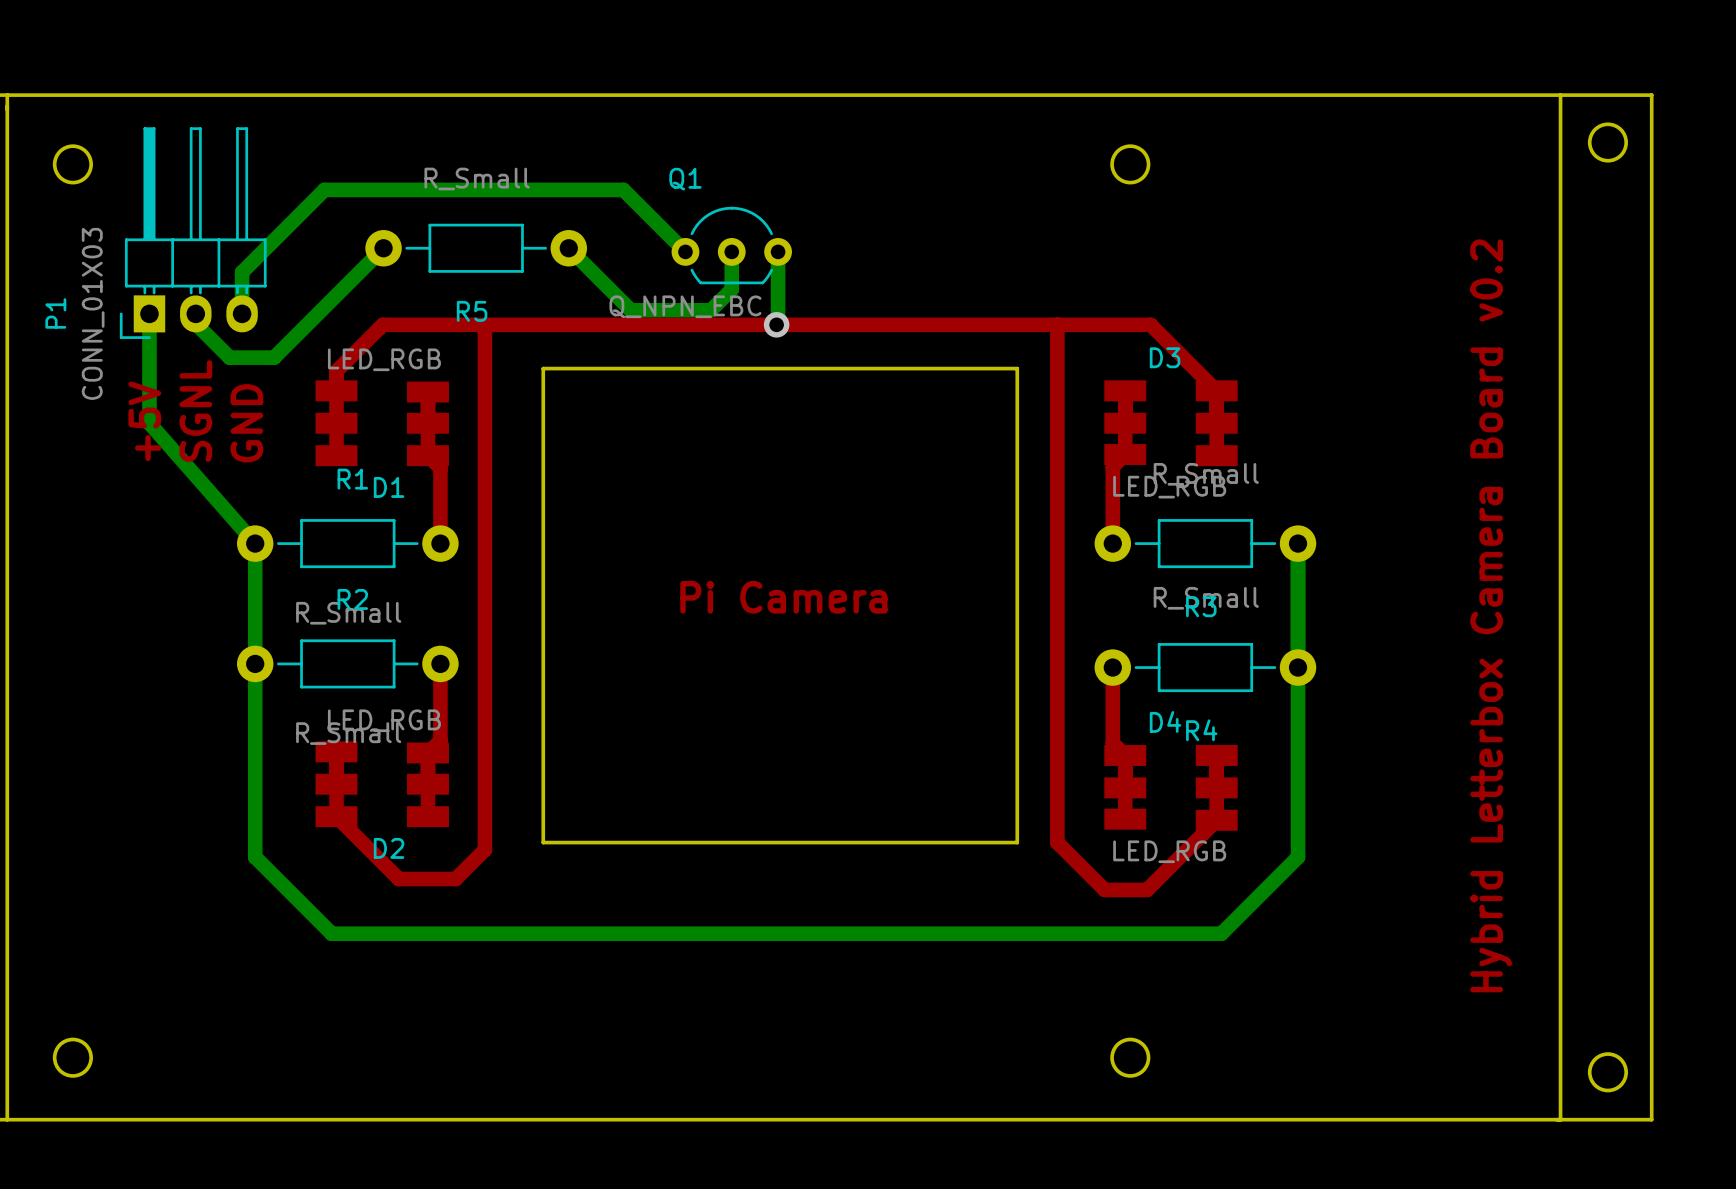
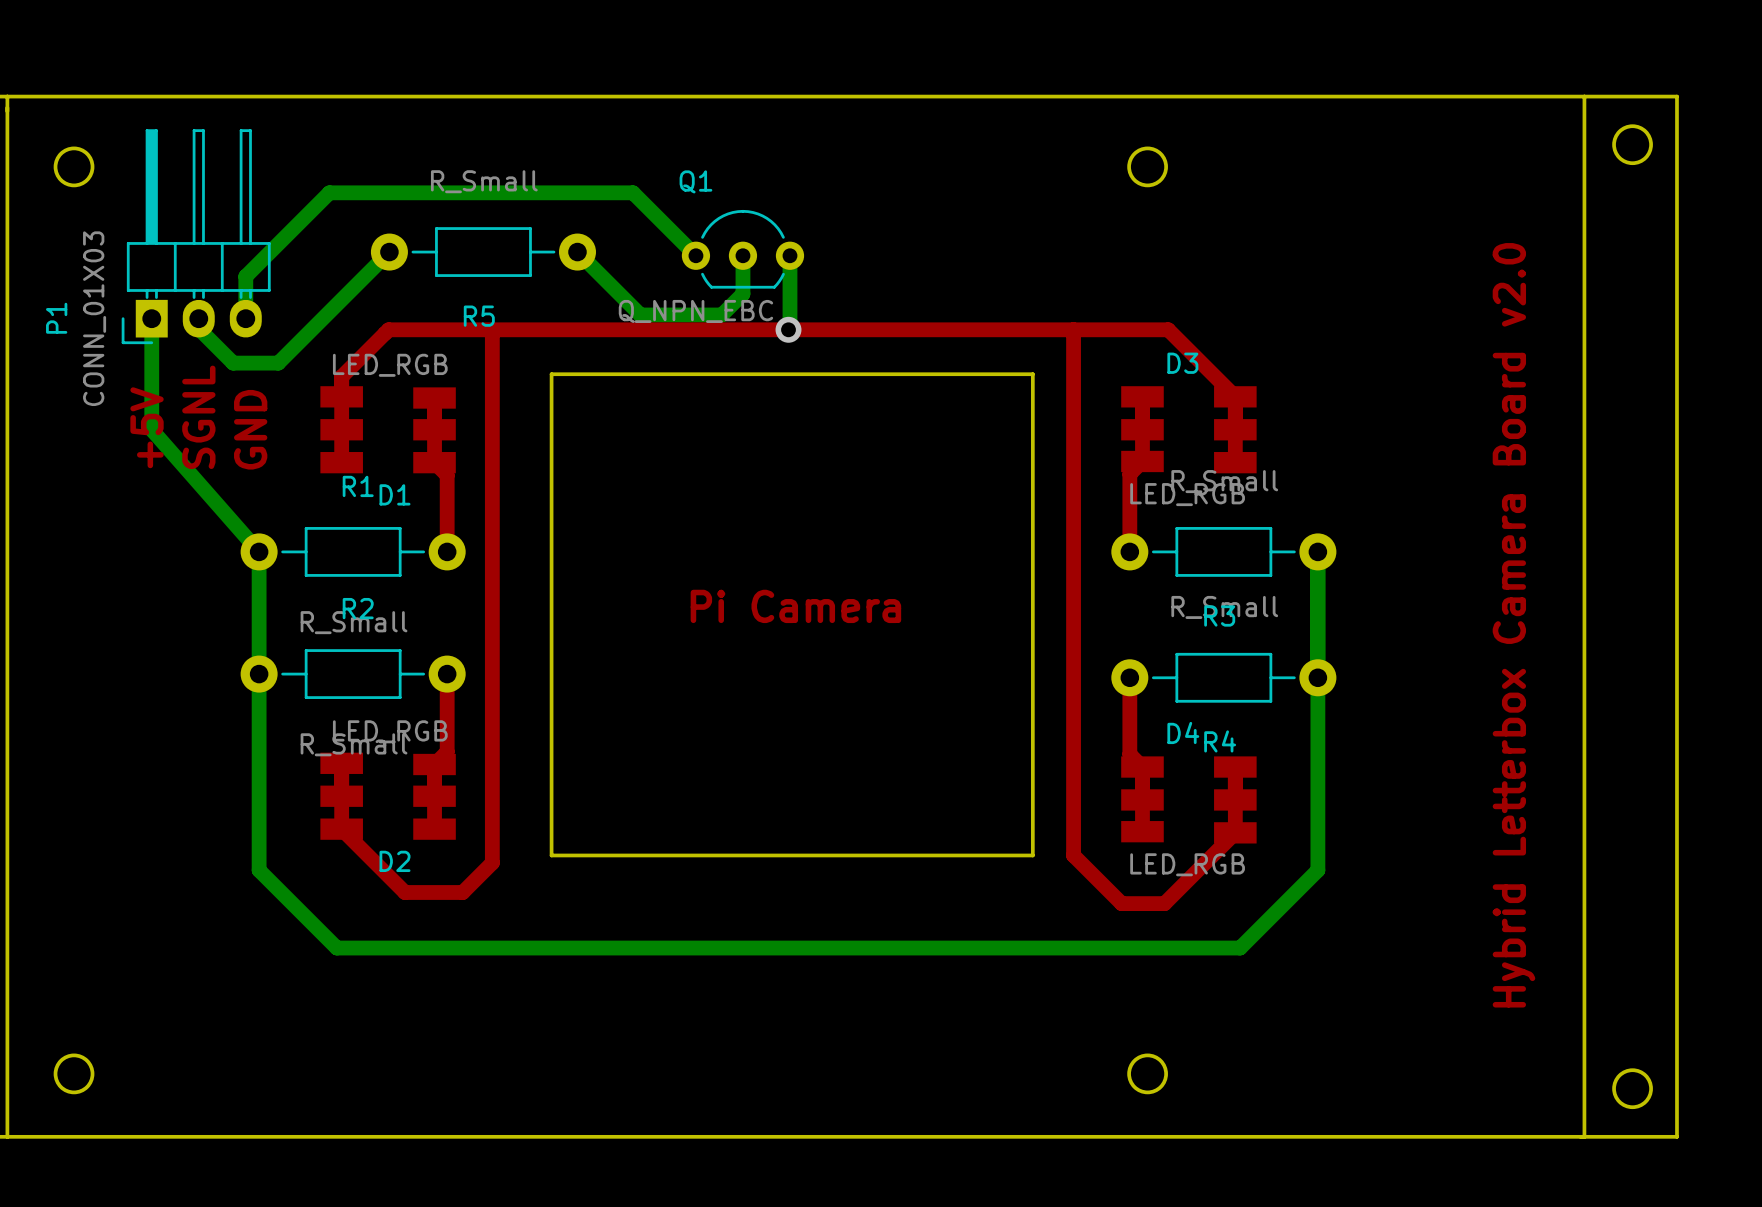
text: Hybrid Letterbox Camera Board v0.2 (1491, 615) -> Hybrid Letterbox Camera Board v2.0 (1513, 625)

